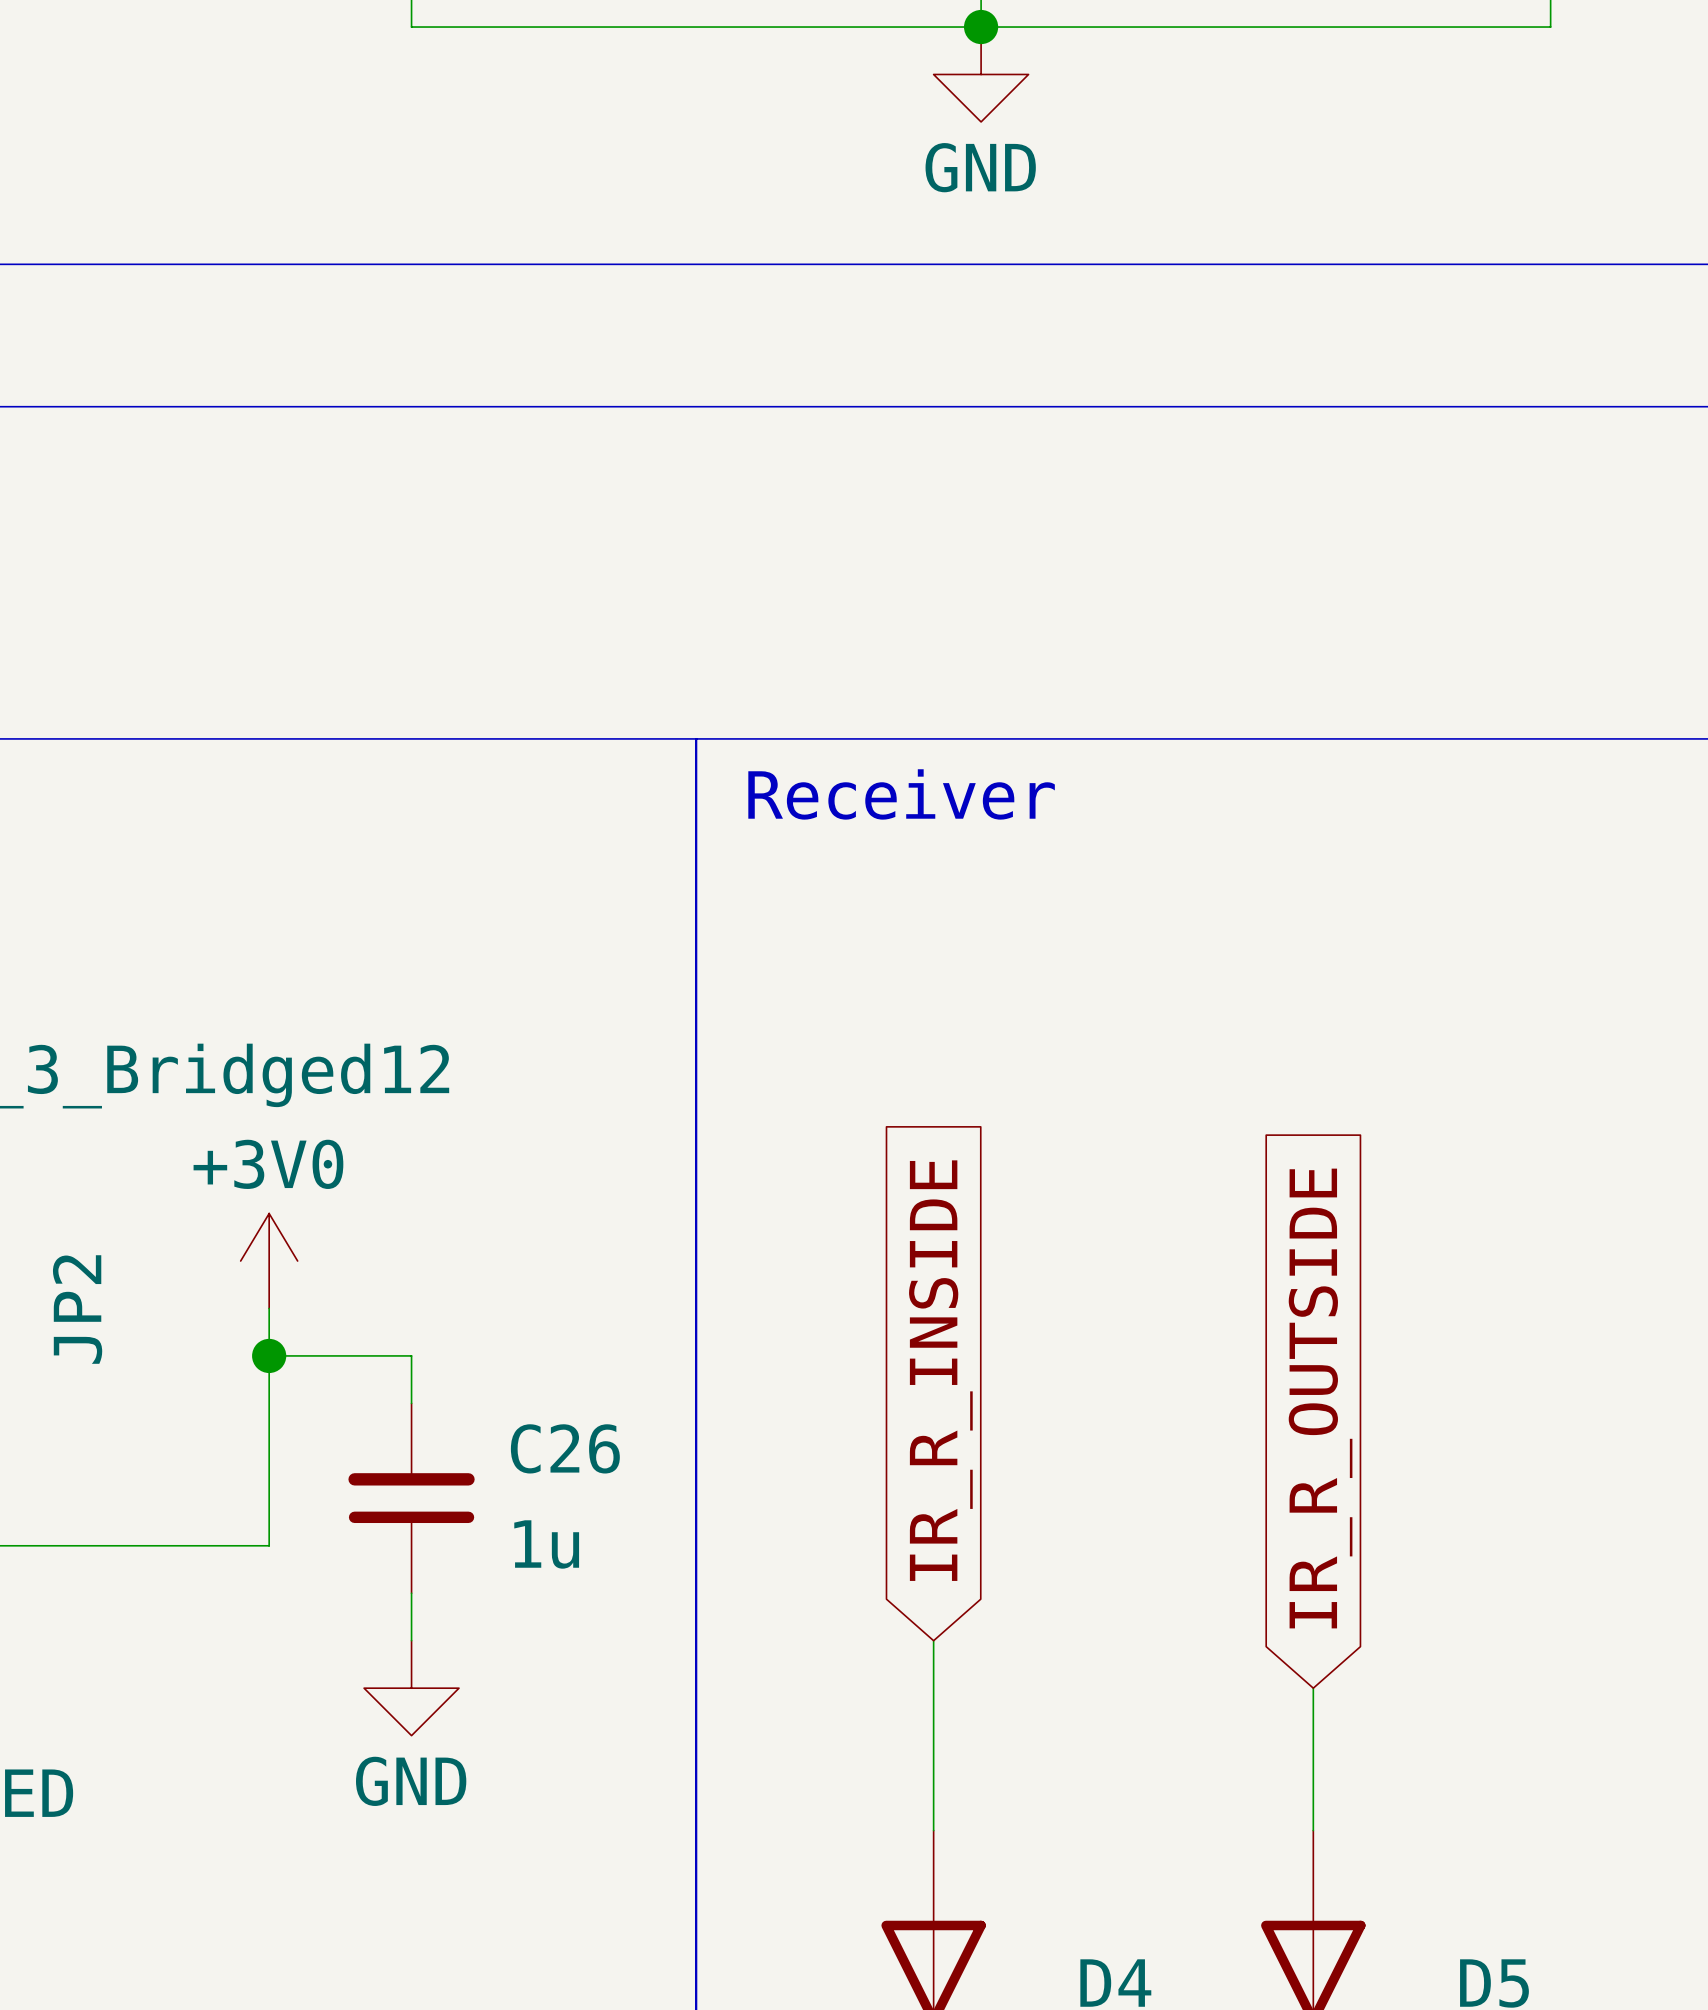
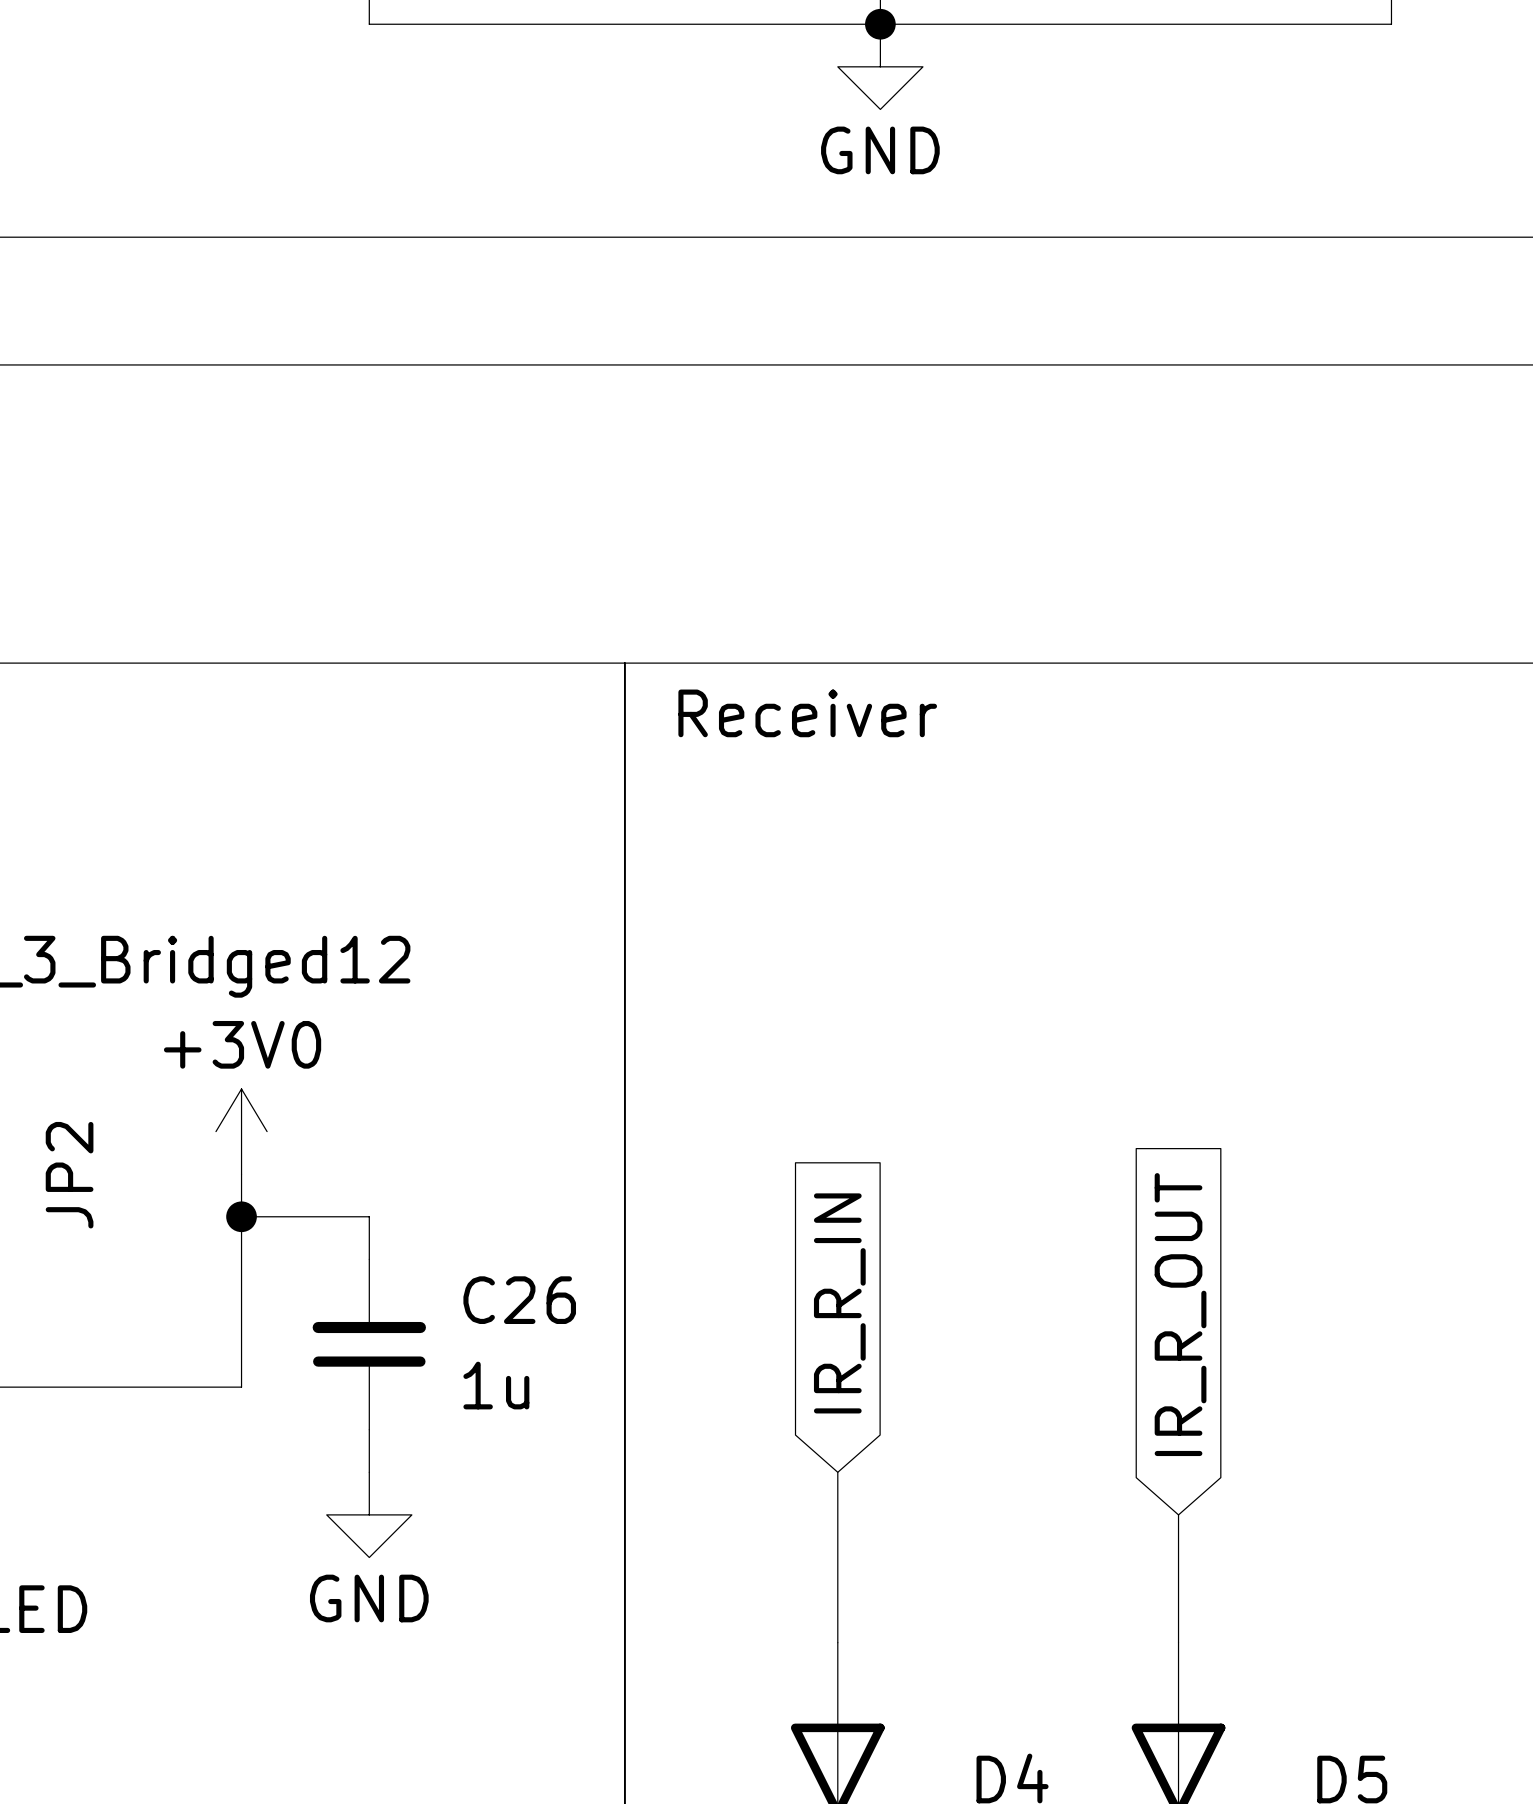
global label: IR_R_INSIDE (940, 1370) -> IR_R_IN (839, 1303)
global label: IR_R_OUTSIDE (1320, 1398) -> IR_R_OUT (1180, 1314)

